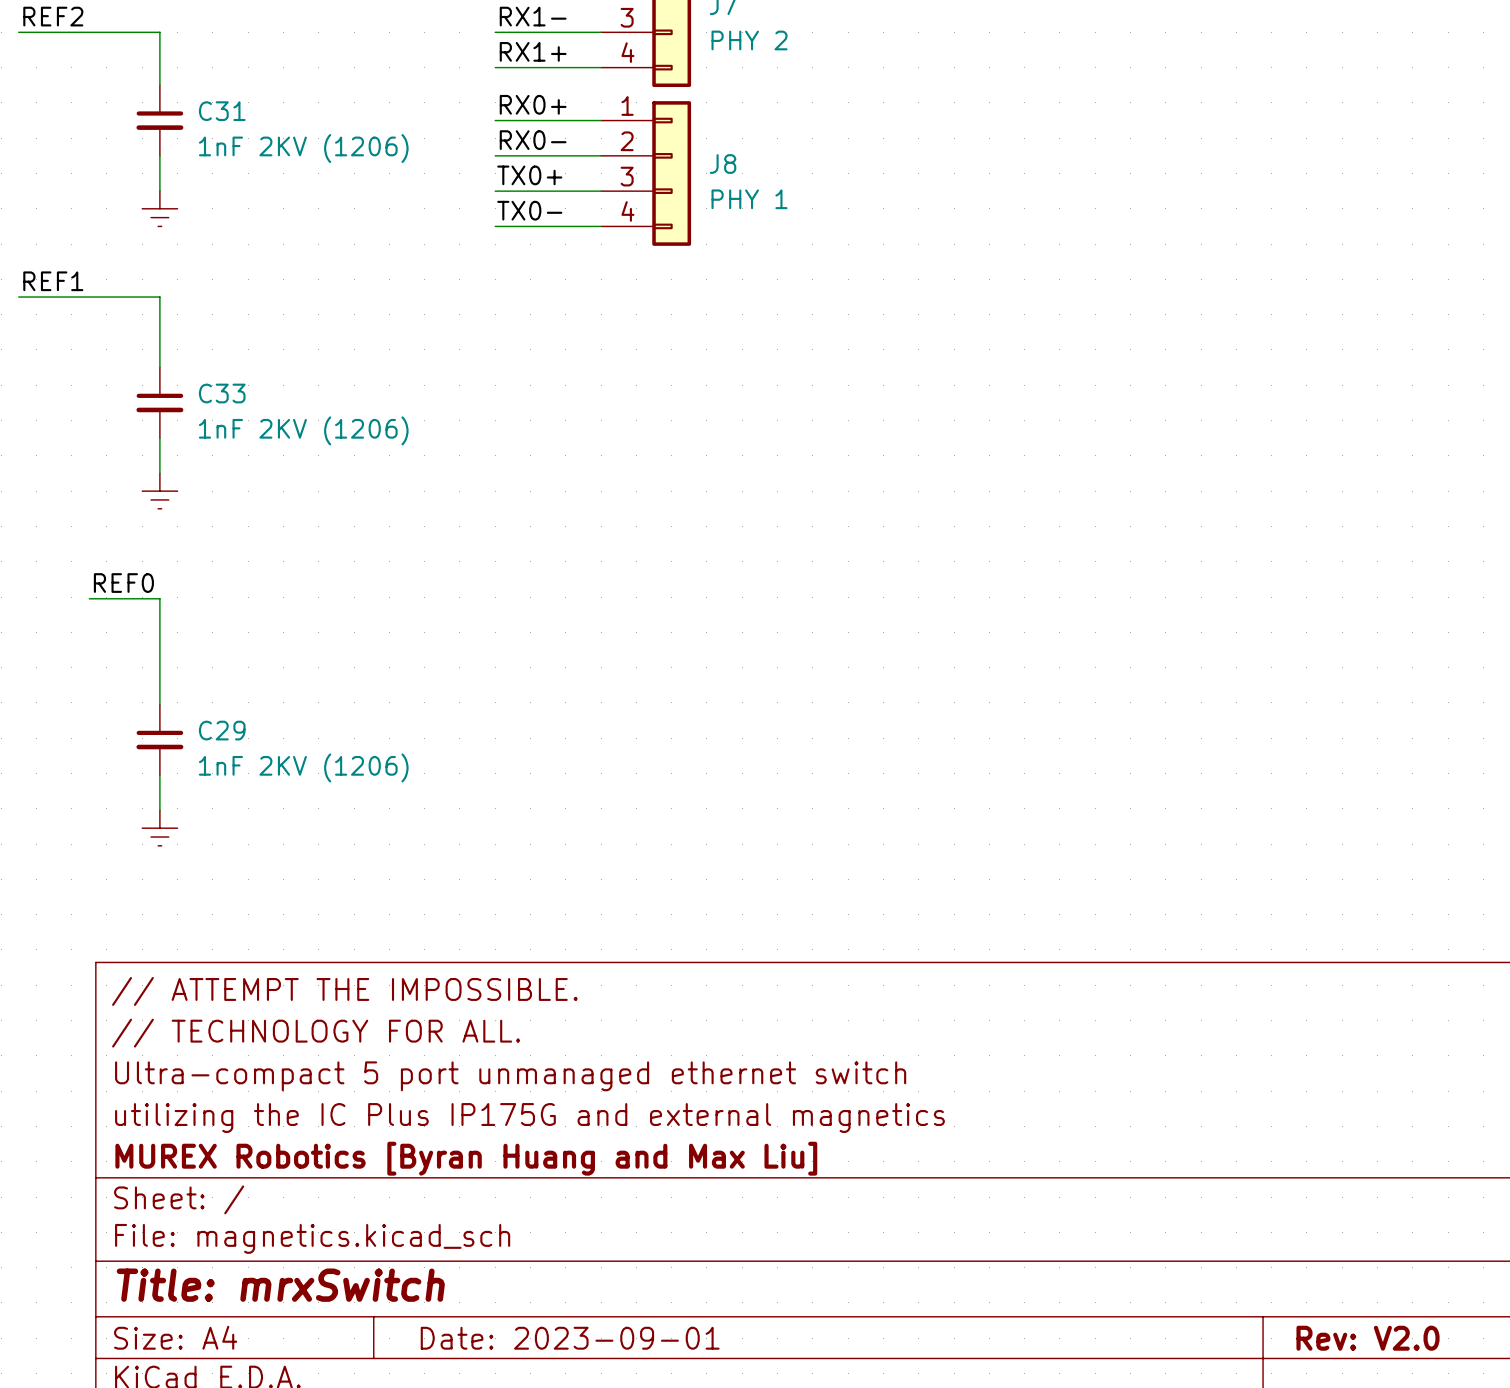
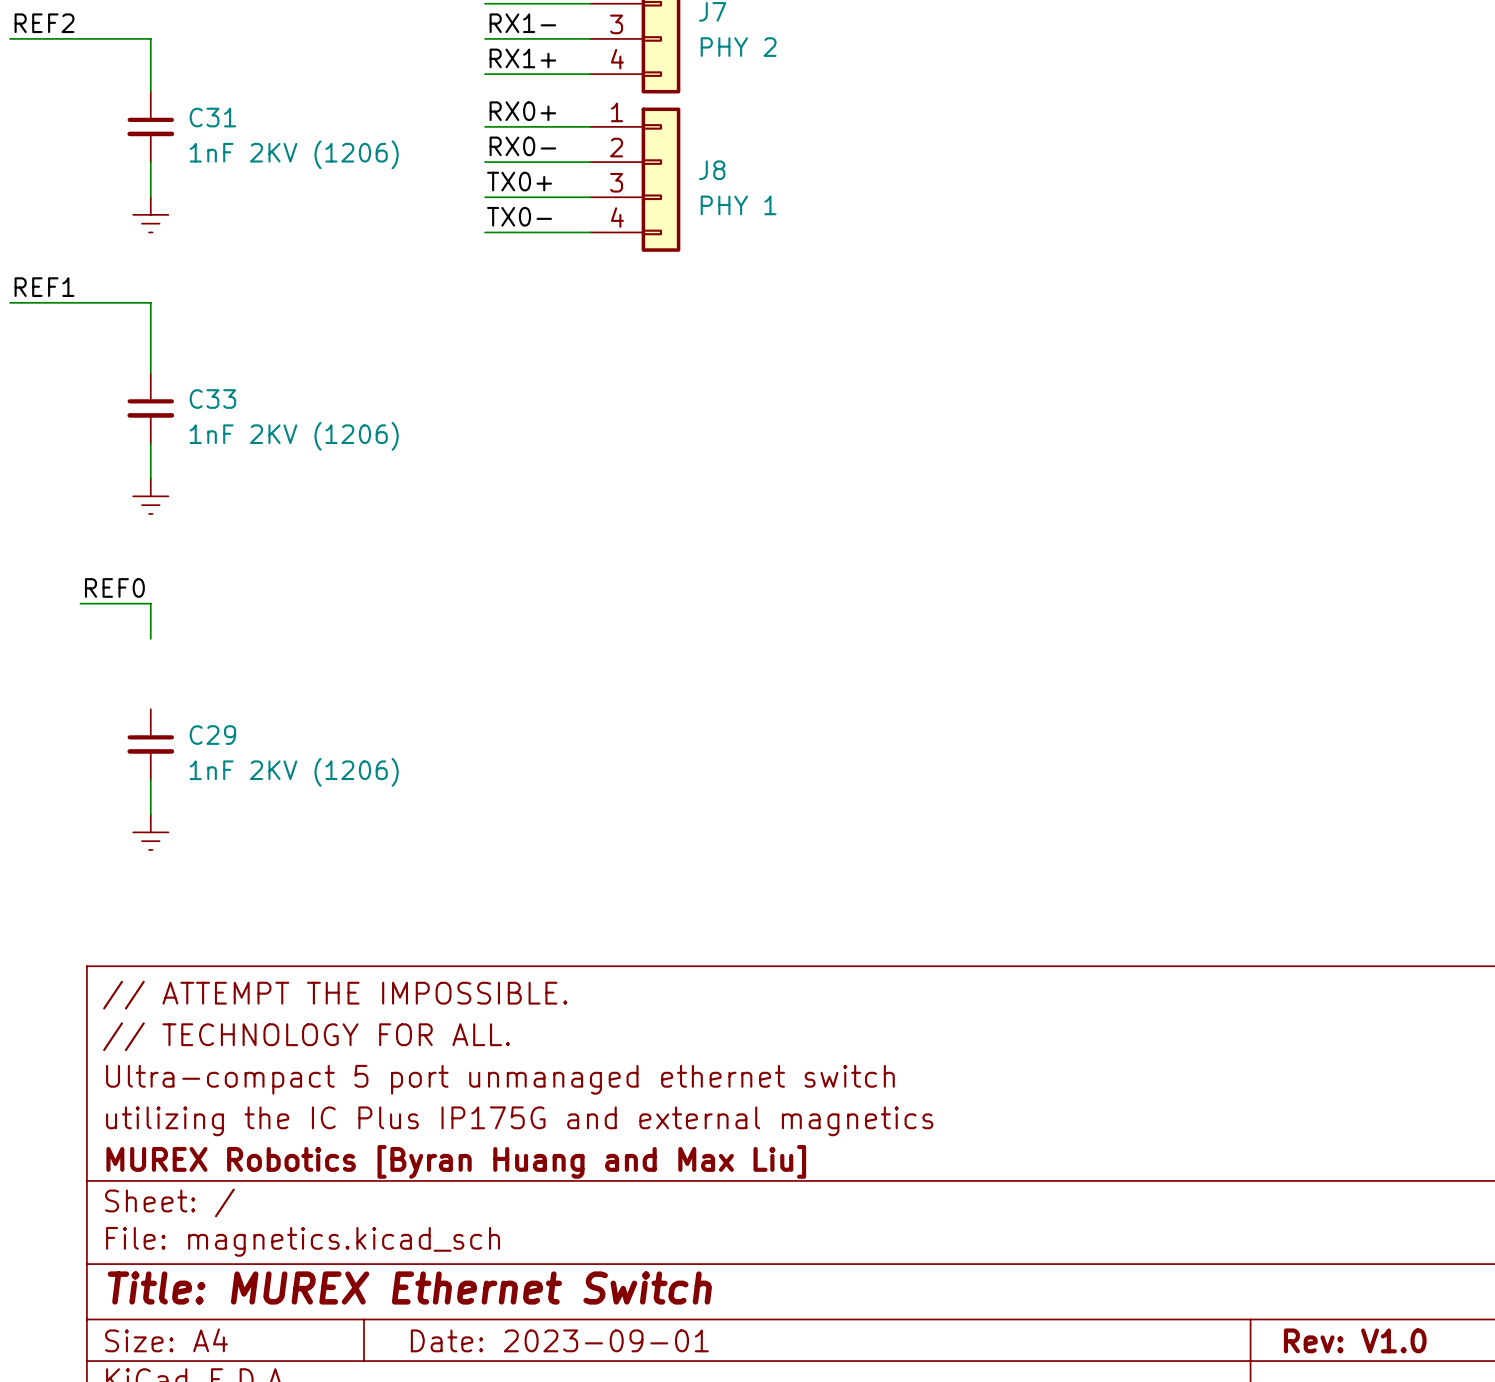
wire: (159, 634) (159, 704) -> none
title block: Title: mrxSwitch (280, 1285) -> Title: MUREX Ethernet Switch (409, 1287)
title block: Rev: V2.0 (1368, 1338) -> Rev: V1.0 (1355, 1340)

